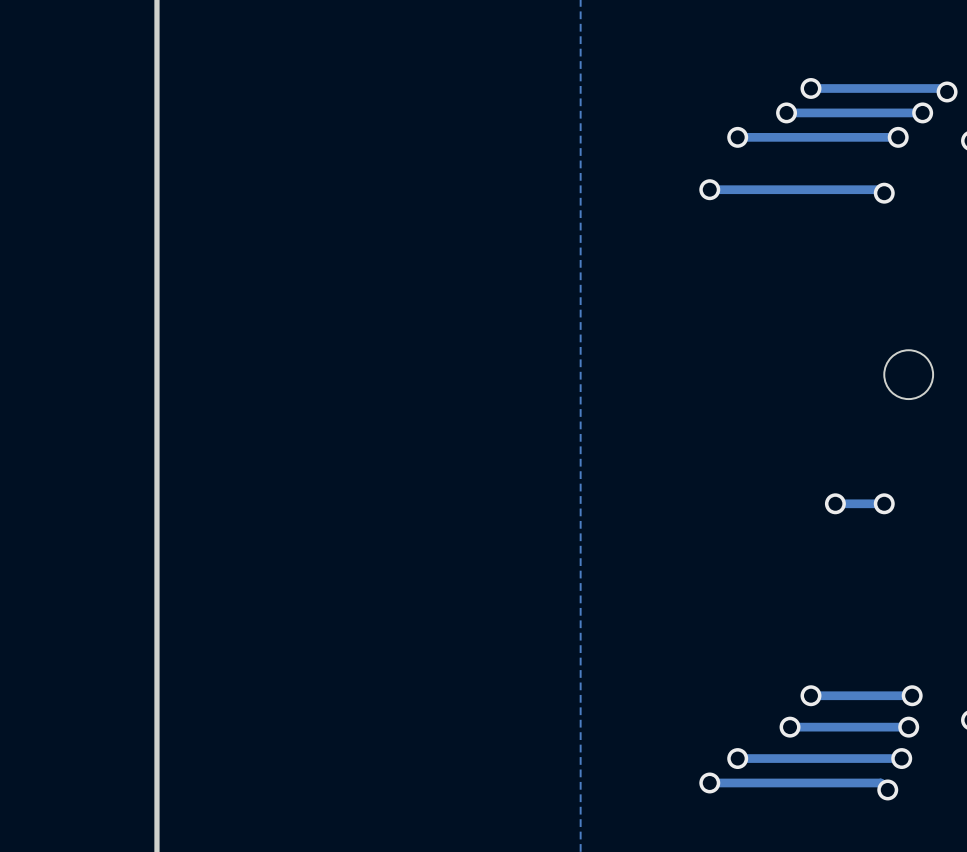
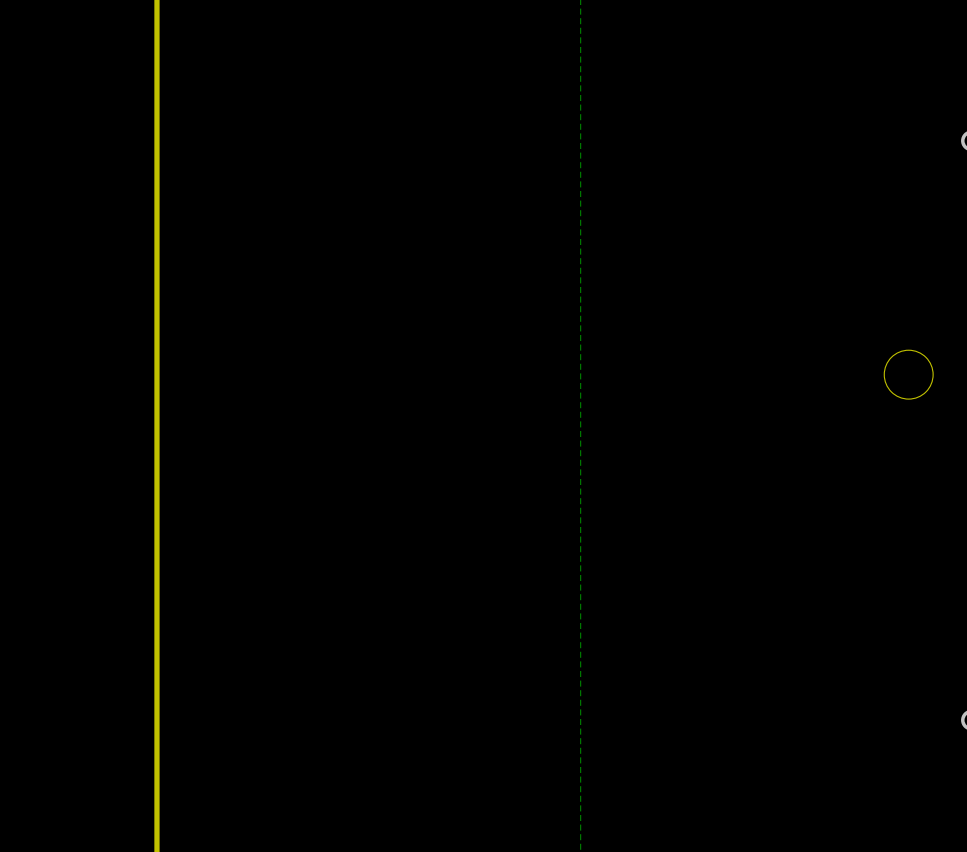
track: (810, 88) (943, 88) (947, 91) -> none
via: (810, 88) -> none
via: (947, 91) -> none
via: (786, 112) -> none
track: (922, 112) (786, 112) -> none
via: (922, 112) -> none
via: (737, 137) -> none
track: (898, 137) (737, 137) -> none
via: (898, 137) -> none
track: (709, 189) (880, 189) (884, 193) -> none
via: (709, 189) -> none
via: (884, 193) -> none
via: (835, 503) -> none
track: (884, 503) (835, 503) -> none
via: (884, 503) -> none
via: (810, 695) -> none
track: (912, 695) (810, 695) -> none
via: (912, 695) -> none
via: (790, 727) -> none
track: (908, 727) (790, 727) -> none
via: (908, 727) -> none
via: (737, 758) -> none
track: (901, 758) (737, 758) -> none
via: (901, 758) -> none
track: (709, 782) (880, 782) (887, 789) -> none
via: (709, 782) -> none
via: (887, 789) -> none

